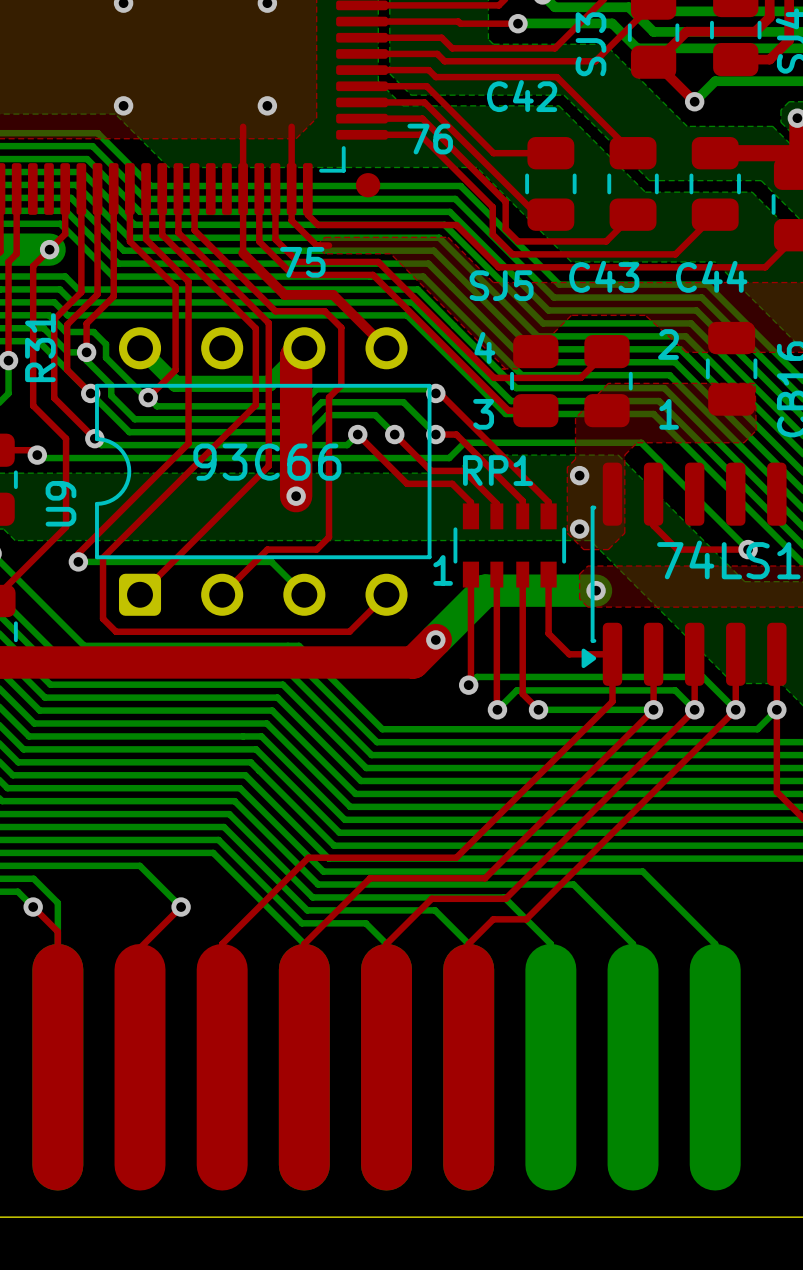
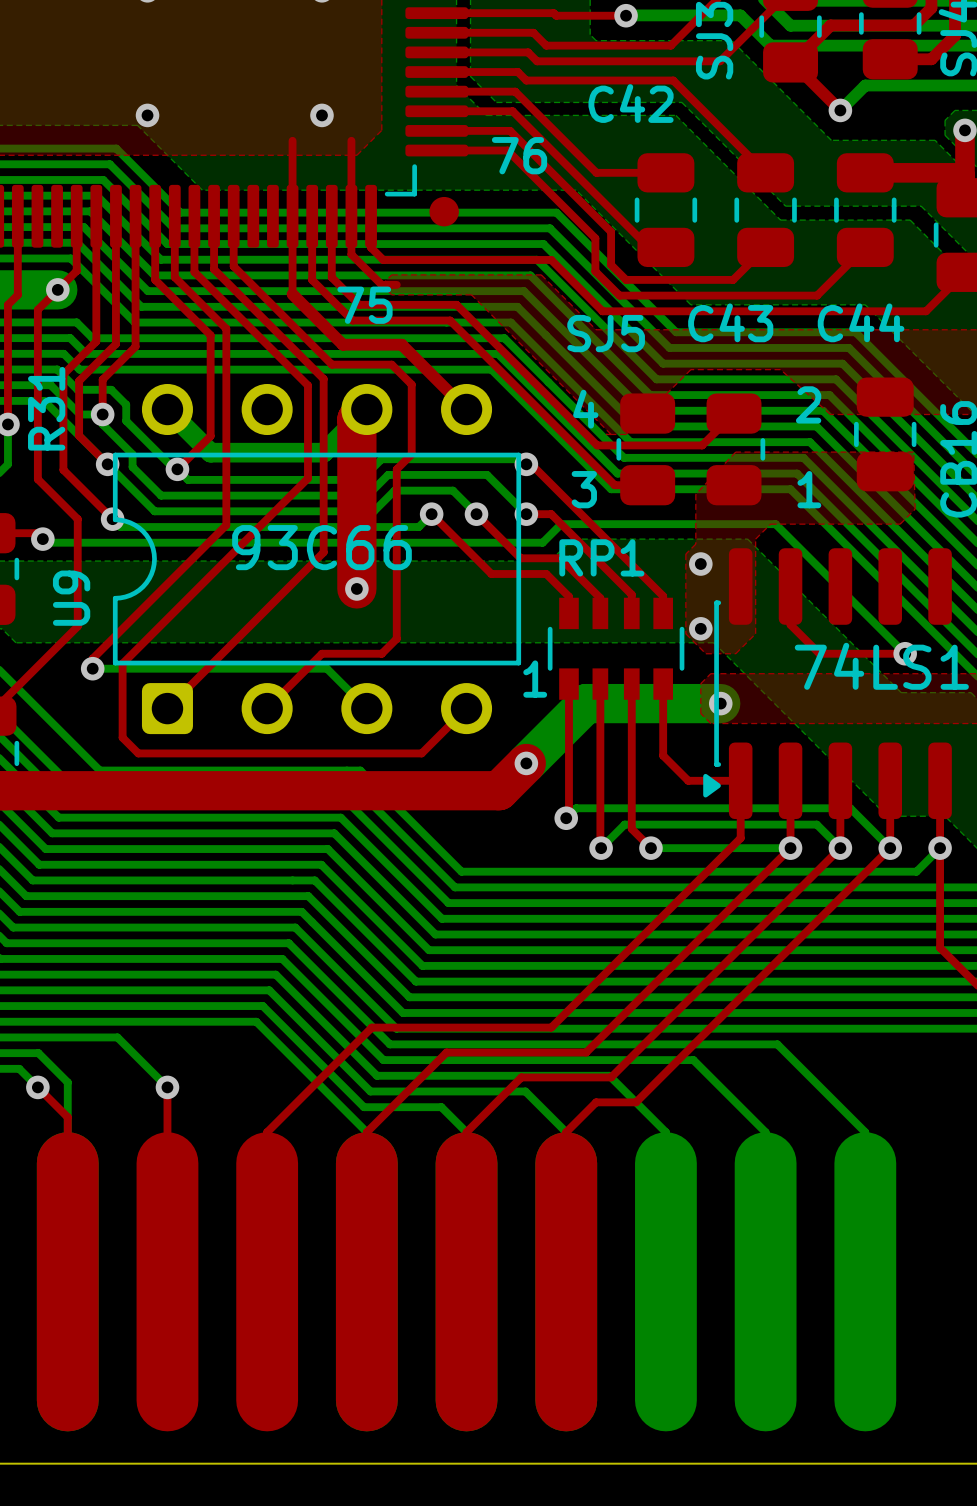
bottom track: (98, 865) (139, 865) (181, 907) -> (117, 1037) (167, 1087)
top track: (181, 907) (140, 948) -> (167, 1087) (167, 1137)
via position: (181, 907) -> (167, 1087)

